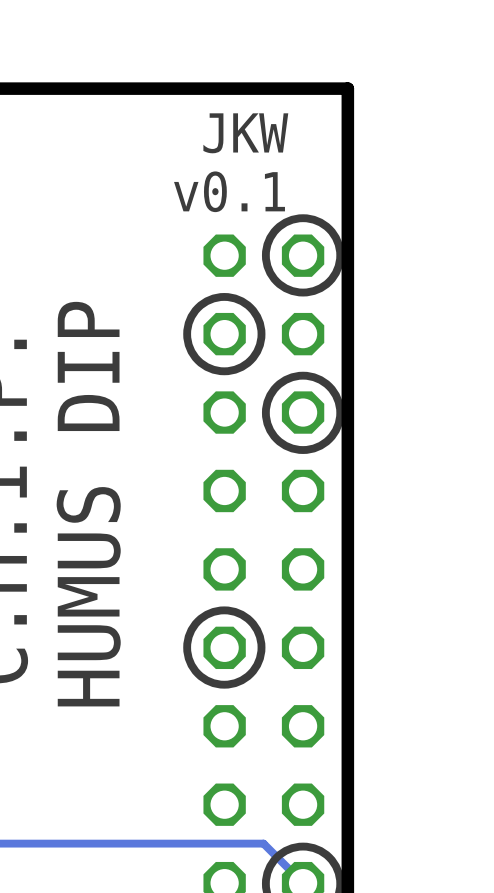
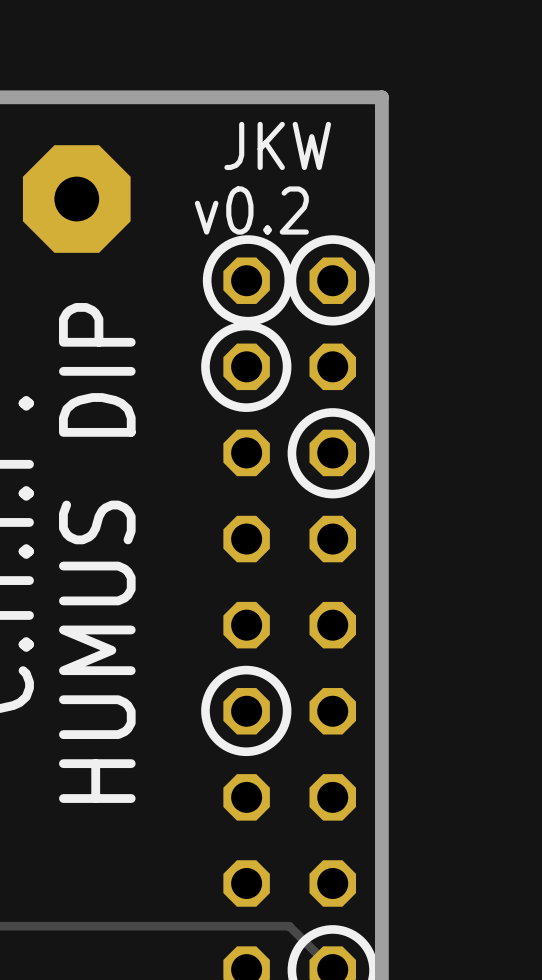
part: none -> (76, 199)
text: v0.1 (229, 191) -> v0.2 (251, 210)
drawing: none -> [202, 235, 294, 326]

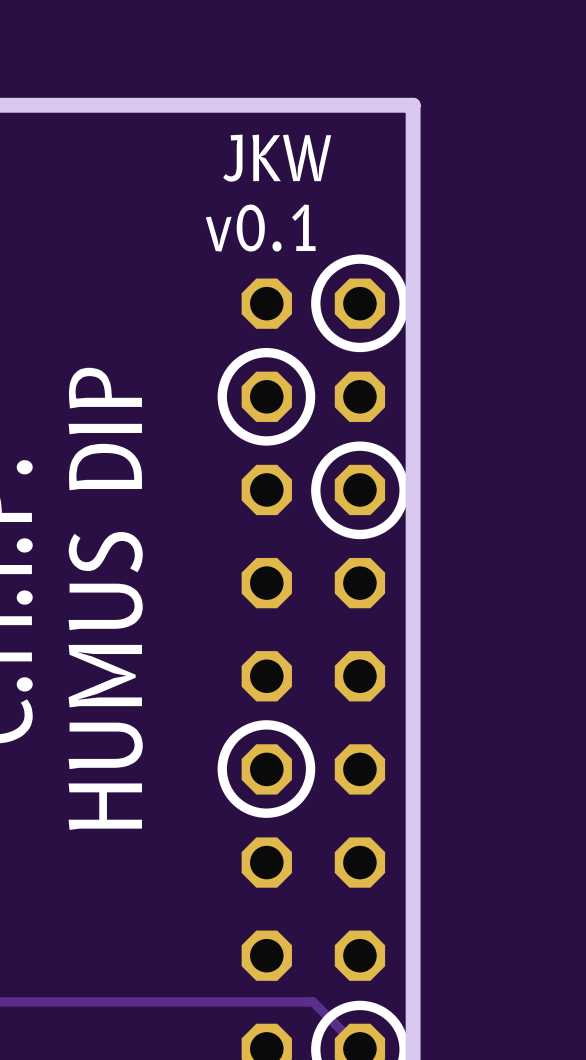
part: (76, 199) -> none
text: v0.2 (251, 210) -> v0.1 (260, 228)
drawing: [202, 235, 294, 326] -> none

